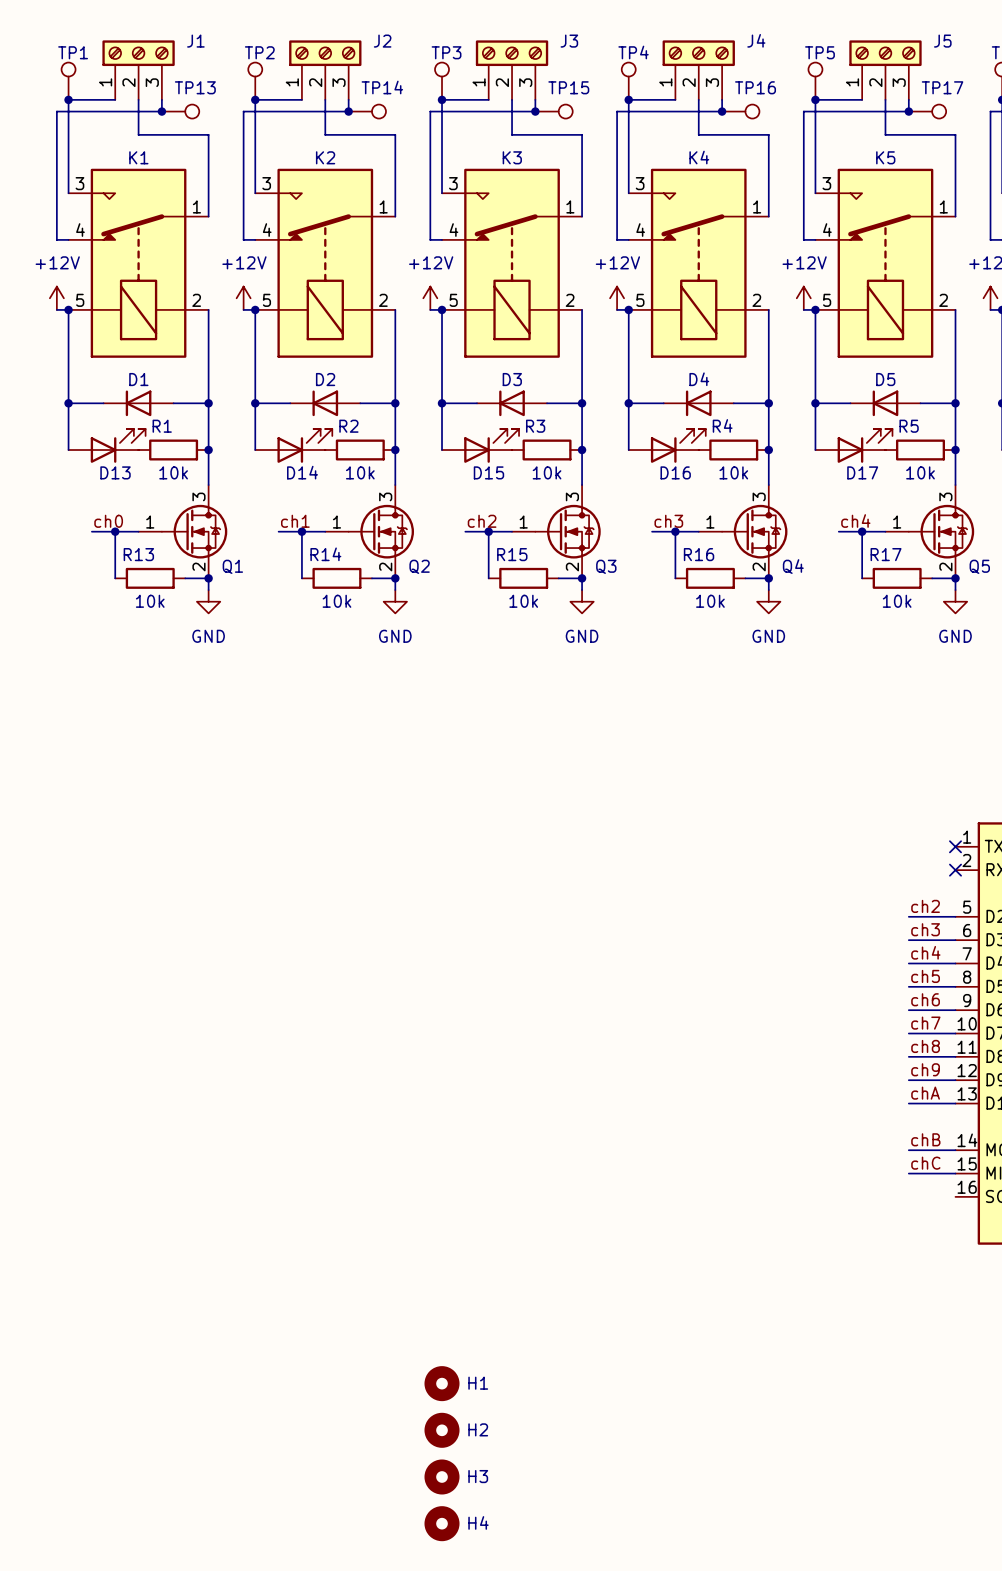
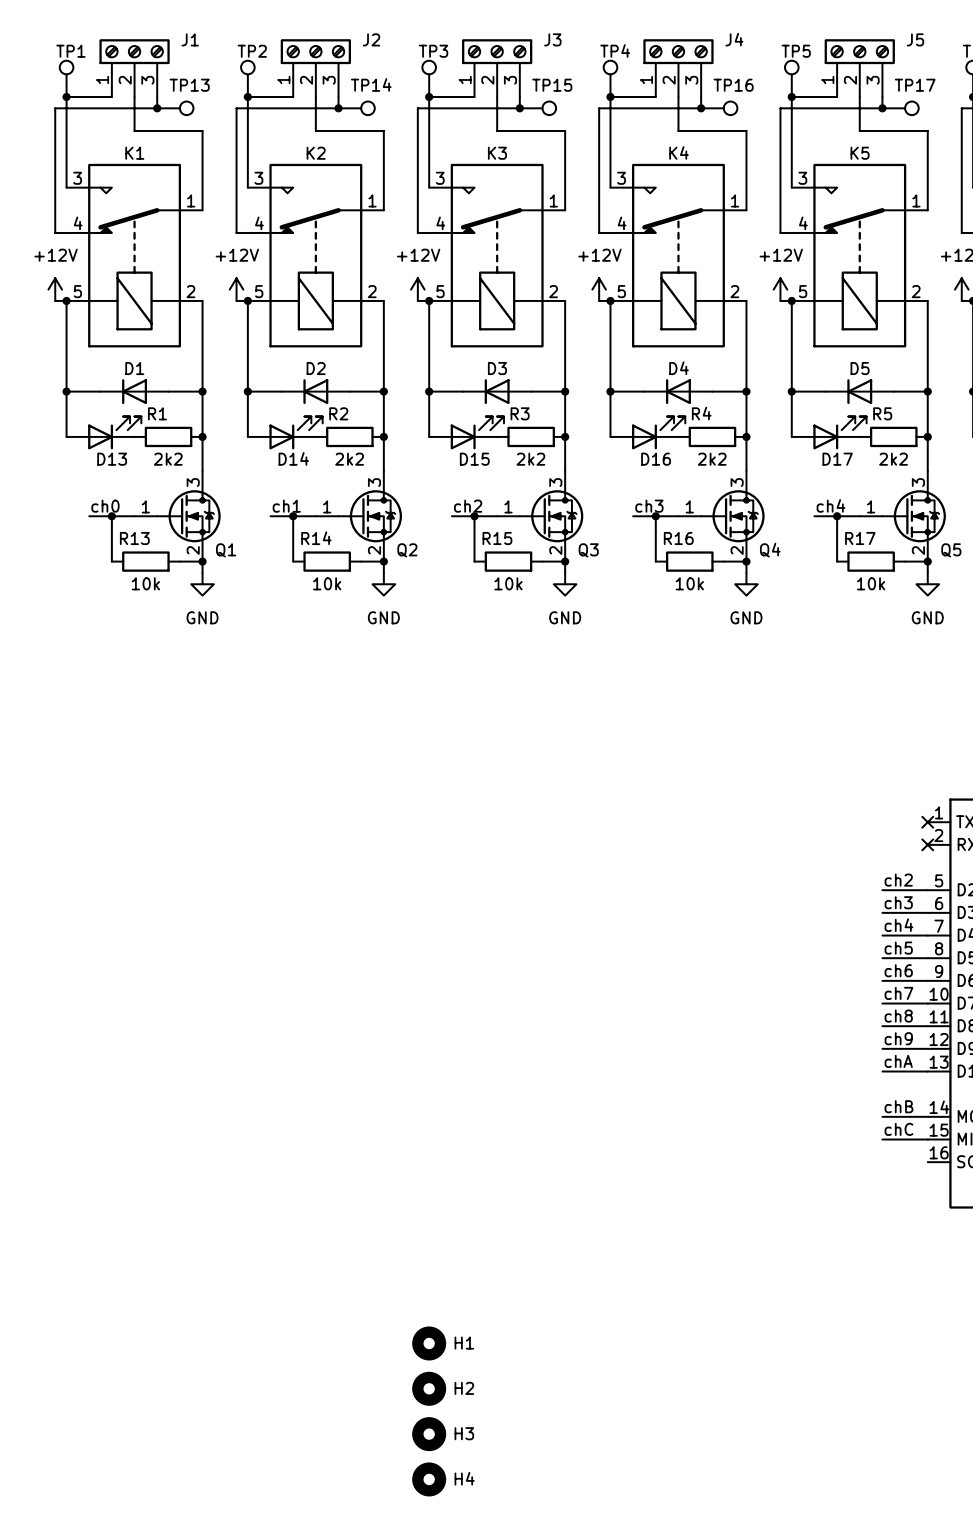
R1 value: 10k (173, 472) -> 2k2 (168, 459)
R2 value: 10k (360, 472) -> 2k2 (349, 459)
R3 value: 10k (547, 472) -> 2k2 (530, 459)
R4 value: 10k (733, 472) -> 2k2 (712, 459)
R5 value: 10k (920, 472) -> 2k2 (893, 459)

